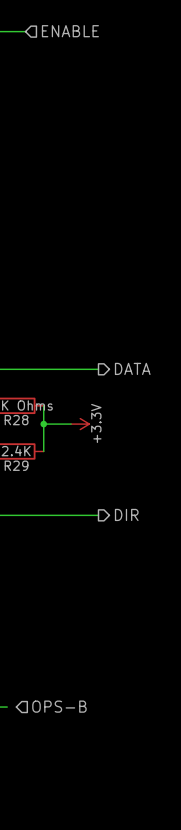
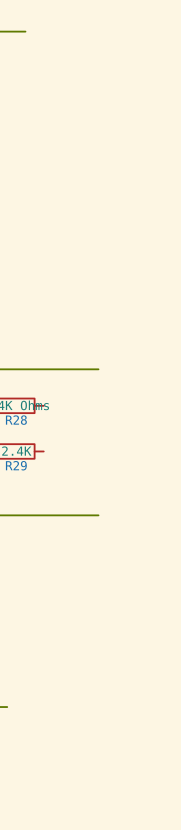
hierarchical label: ENABLE (70, 31) -> none
hierarchical label: DATA (132, 368) -> none
wire: (43, 405) (43, 451) -> none
wire: (43, 424) (71, 424) -> none
junction: (43, 424) -> none
power symbol: +3.3V (80, 424) -> none
hierarchical label: DIR (126, 514) -> none
hierarchical label: OPS-B (59, 706) -> none

